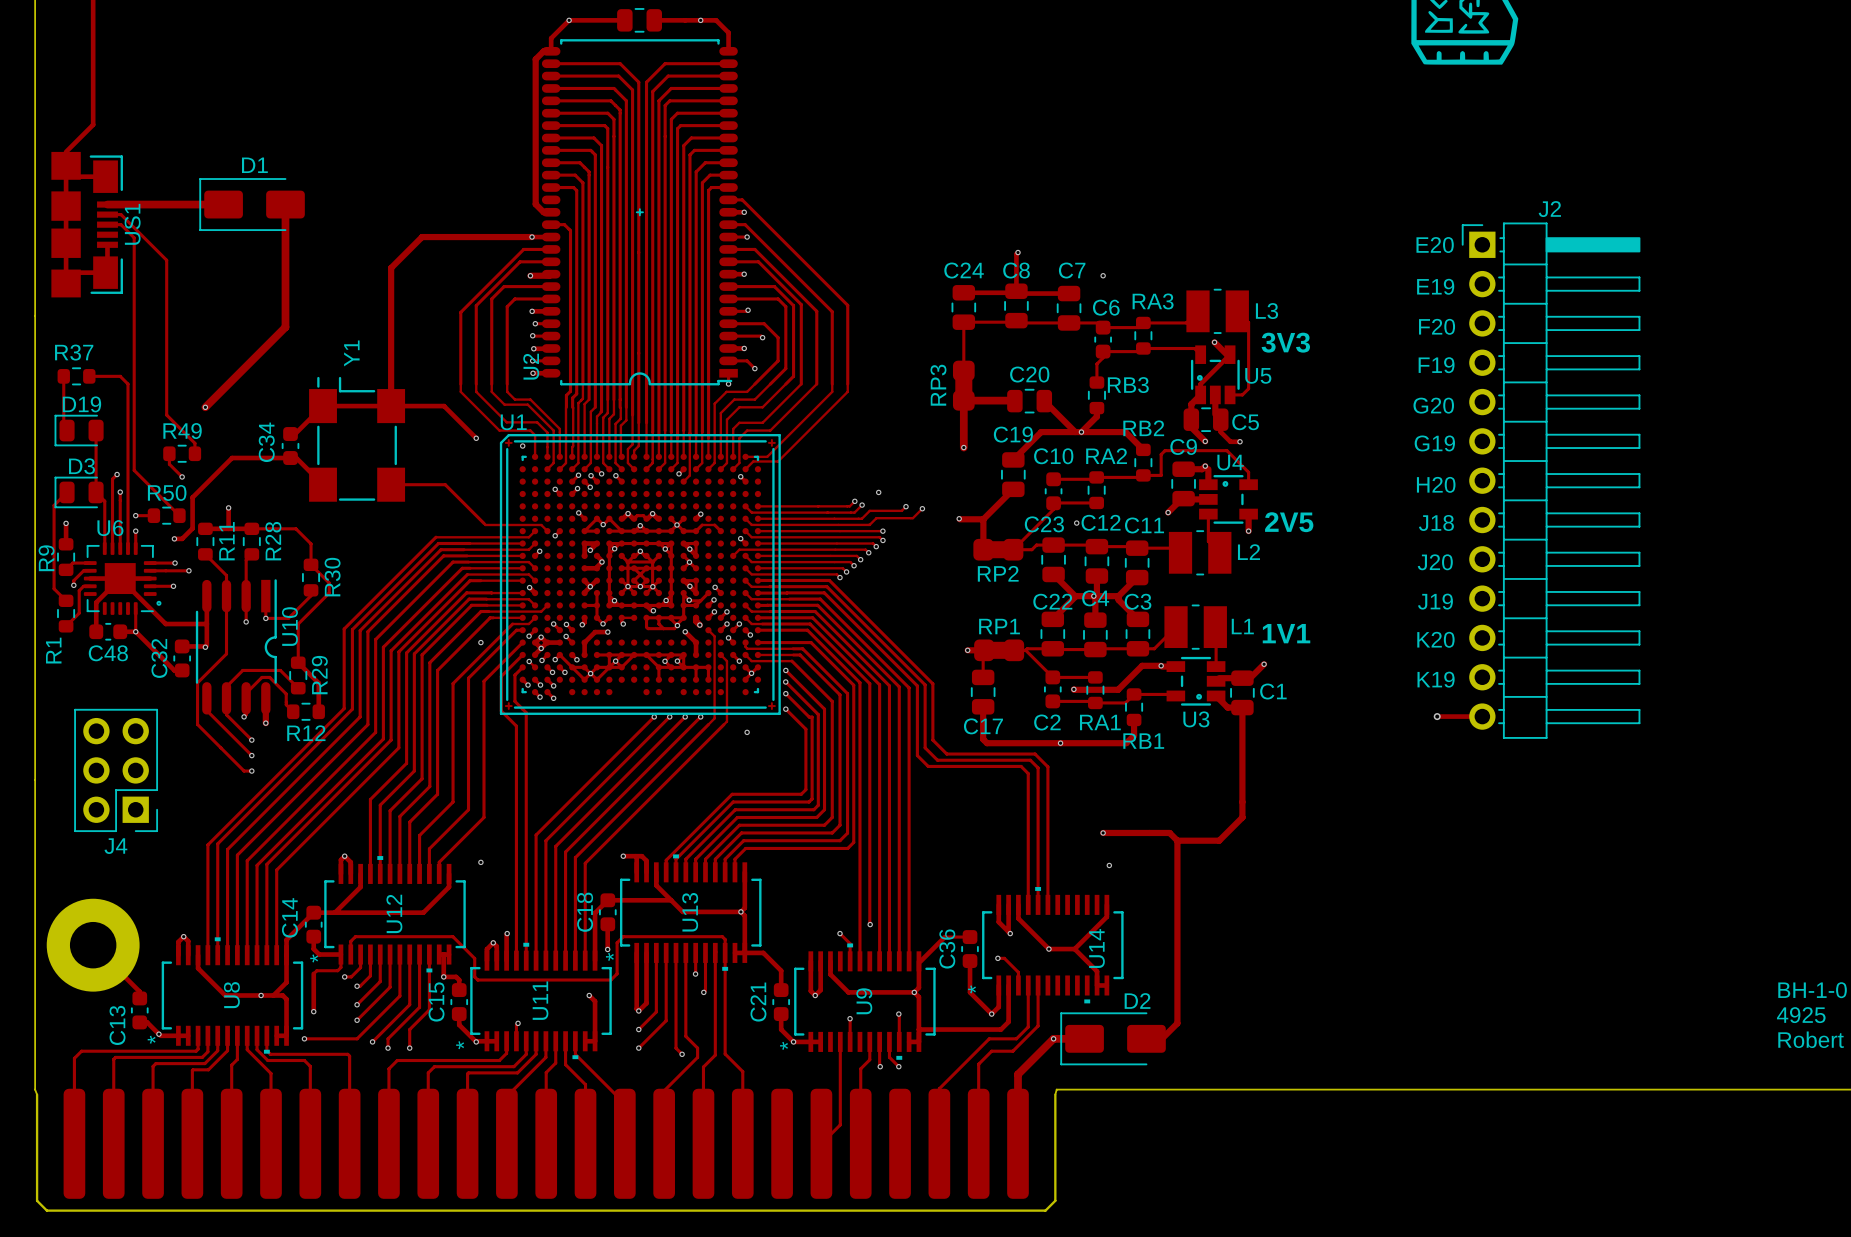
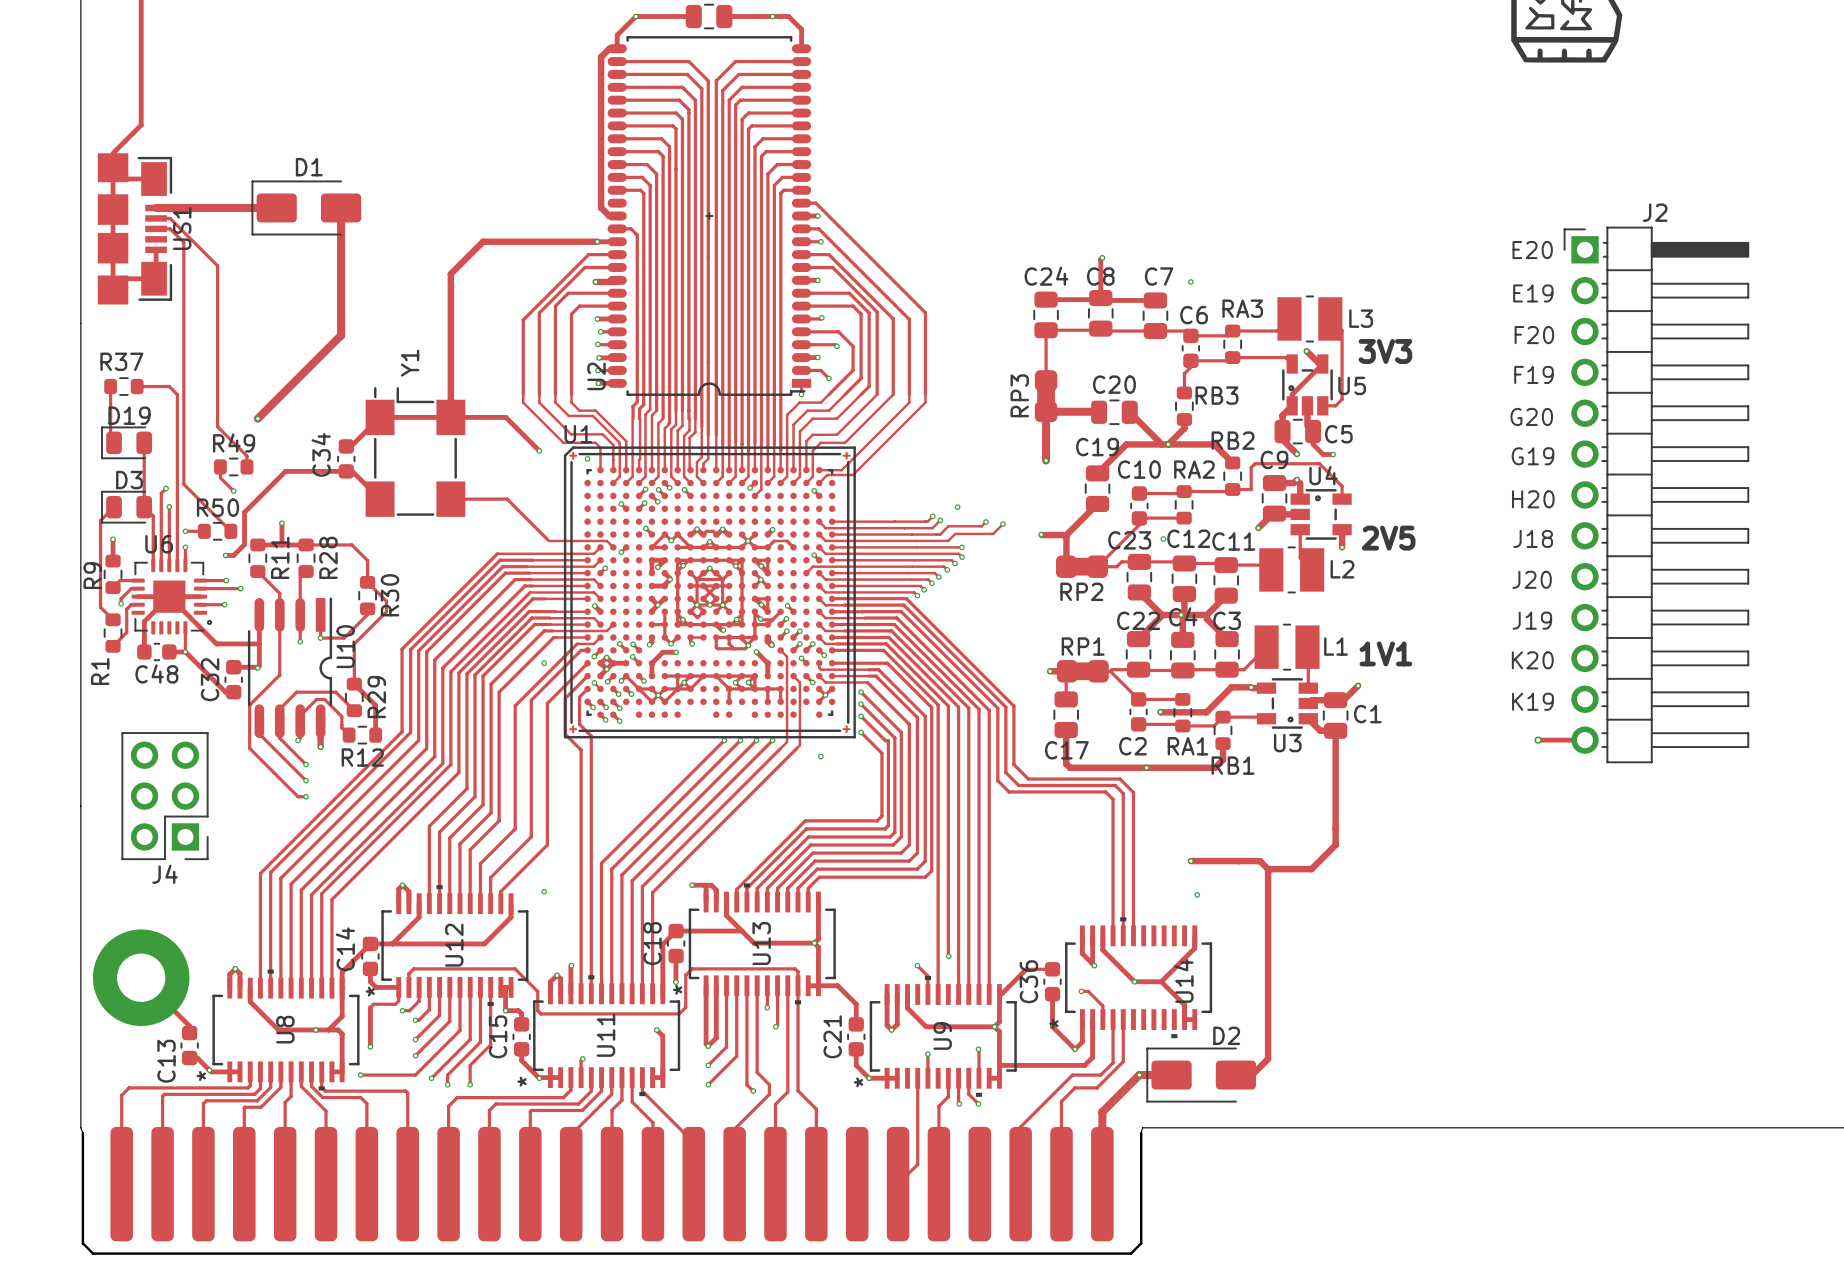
track: none -> (690, 611) (697, 617) (703, 611)

